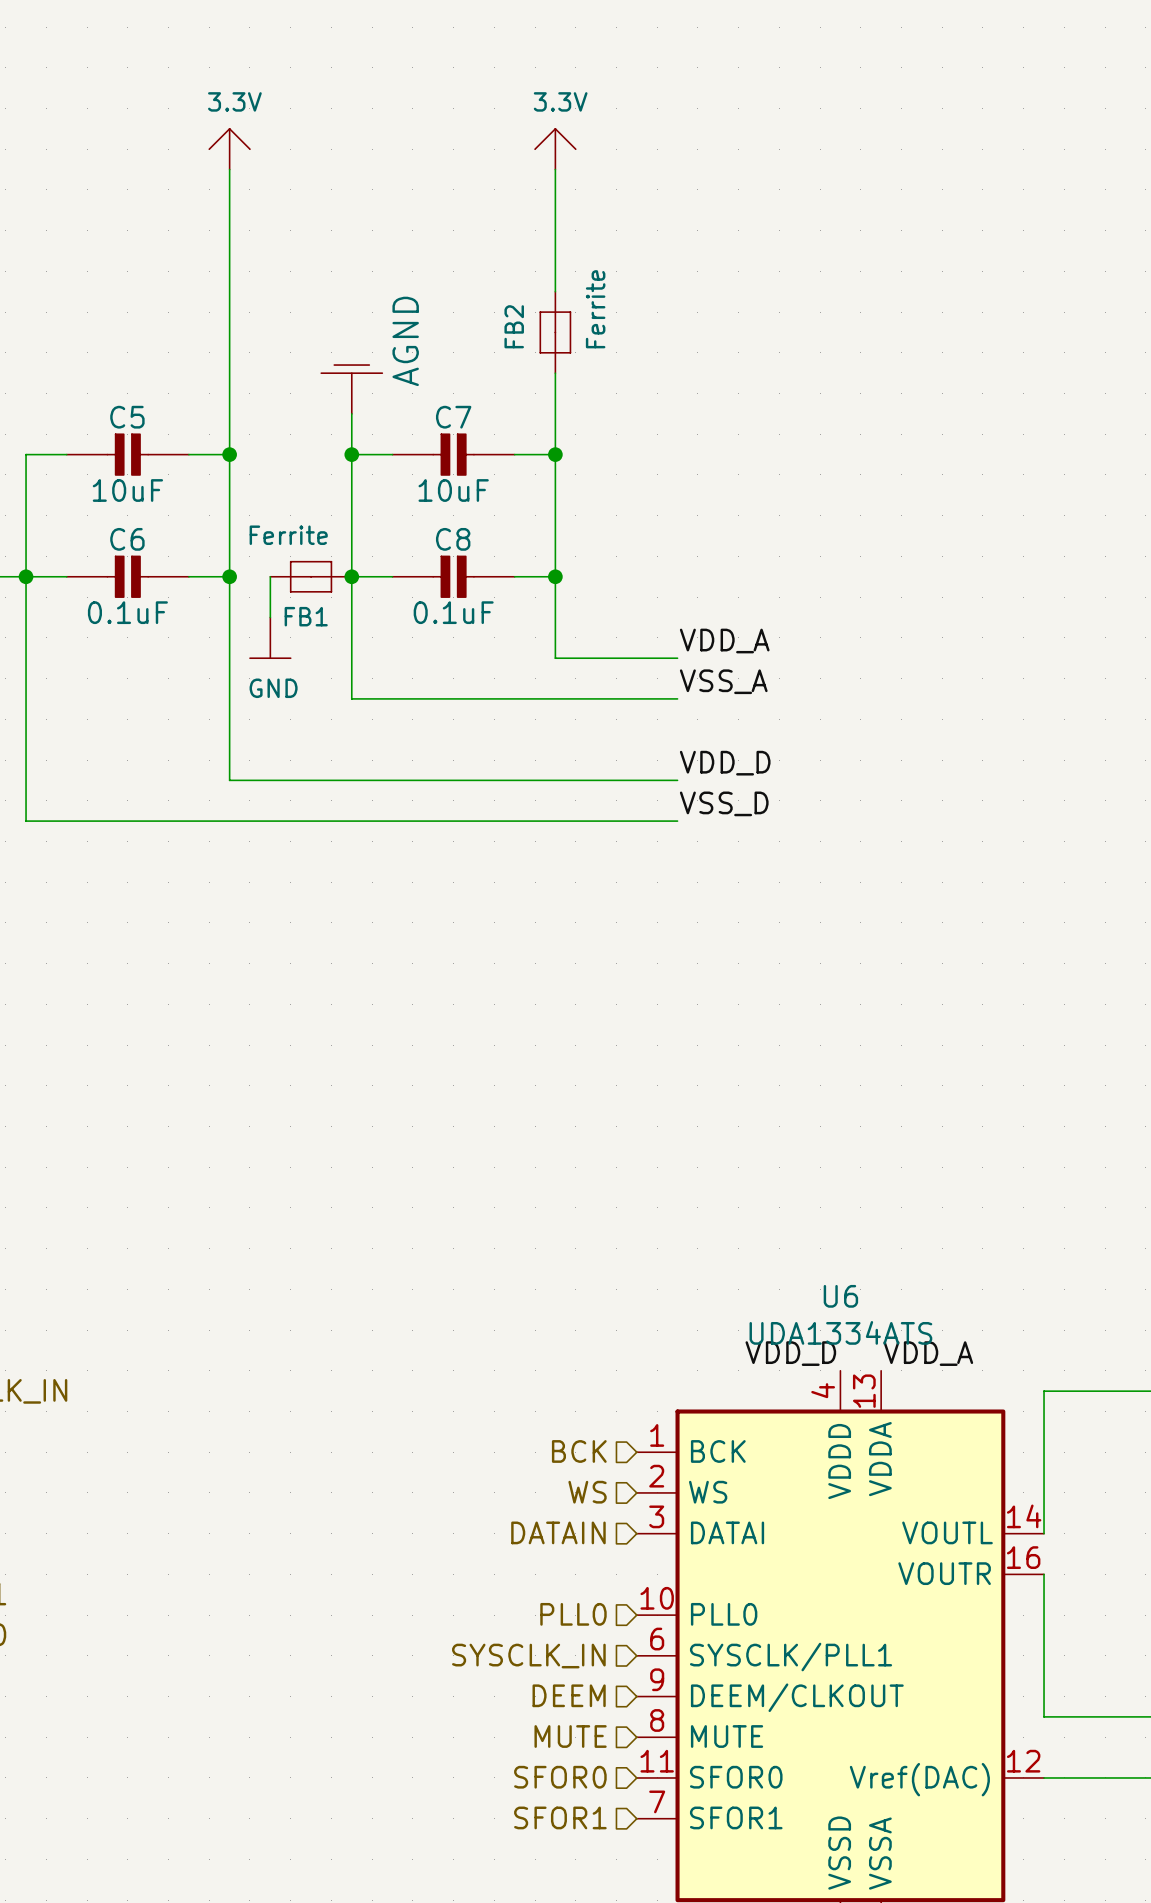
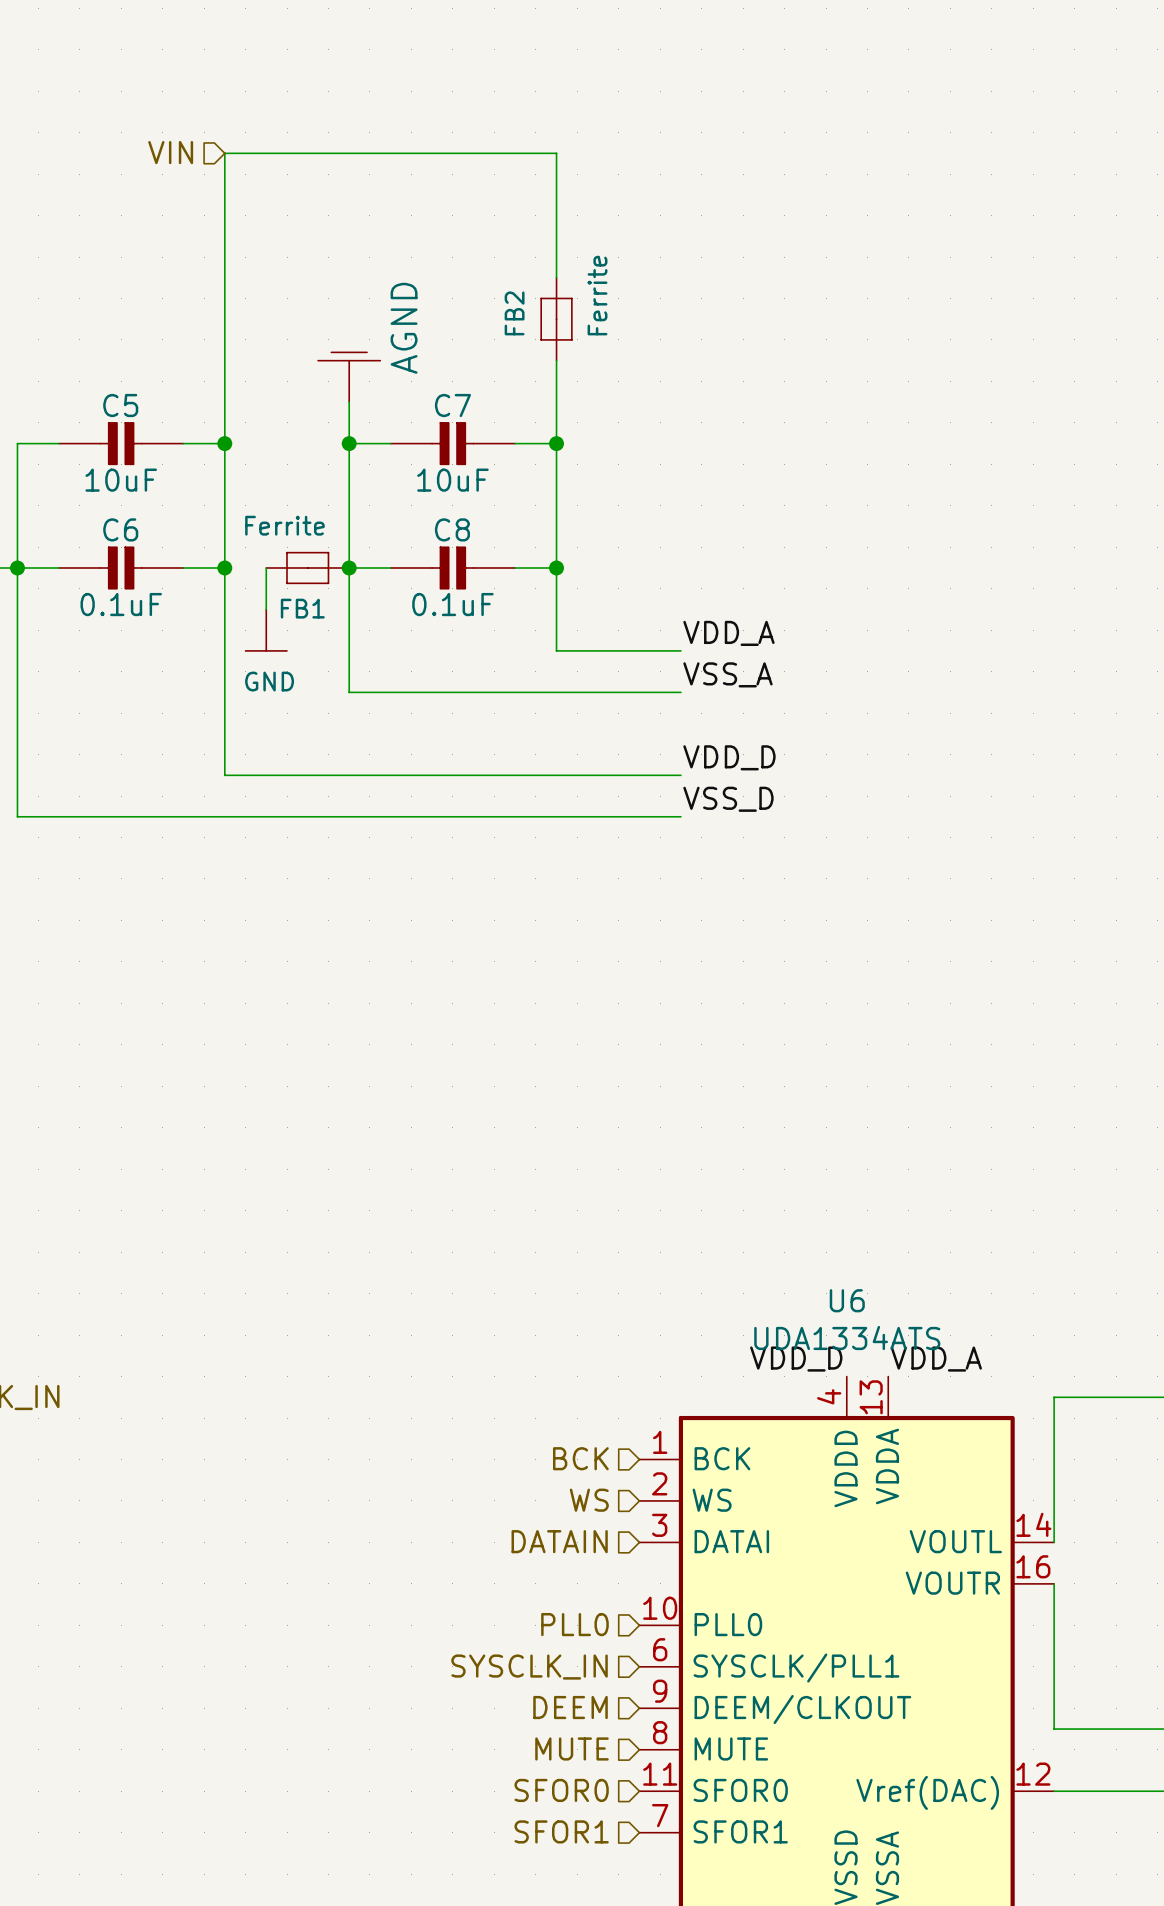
power symbol: 3.3V (229, 149) -> none
power symbol: 3.3V (555, 149) -> none
hierarchical label: none -> VIN (170, 152)
wire: none -> (224, 153) (556, 153)

